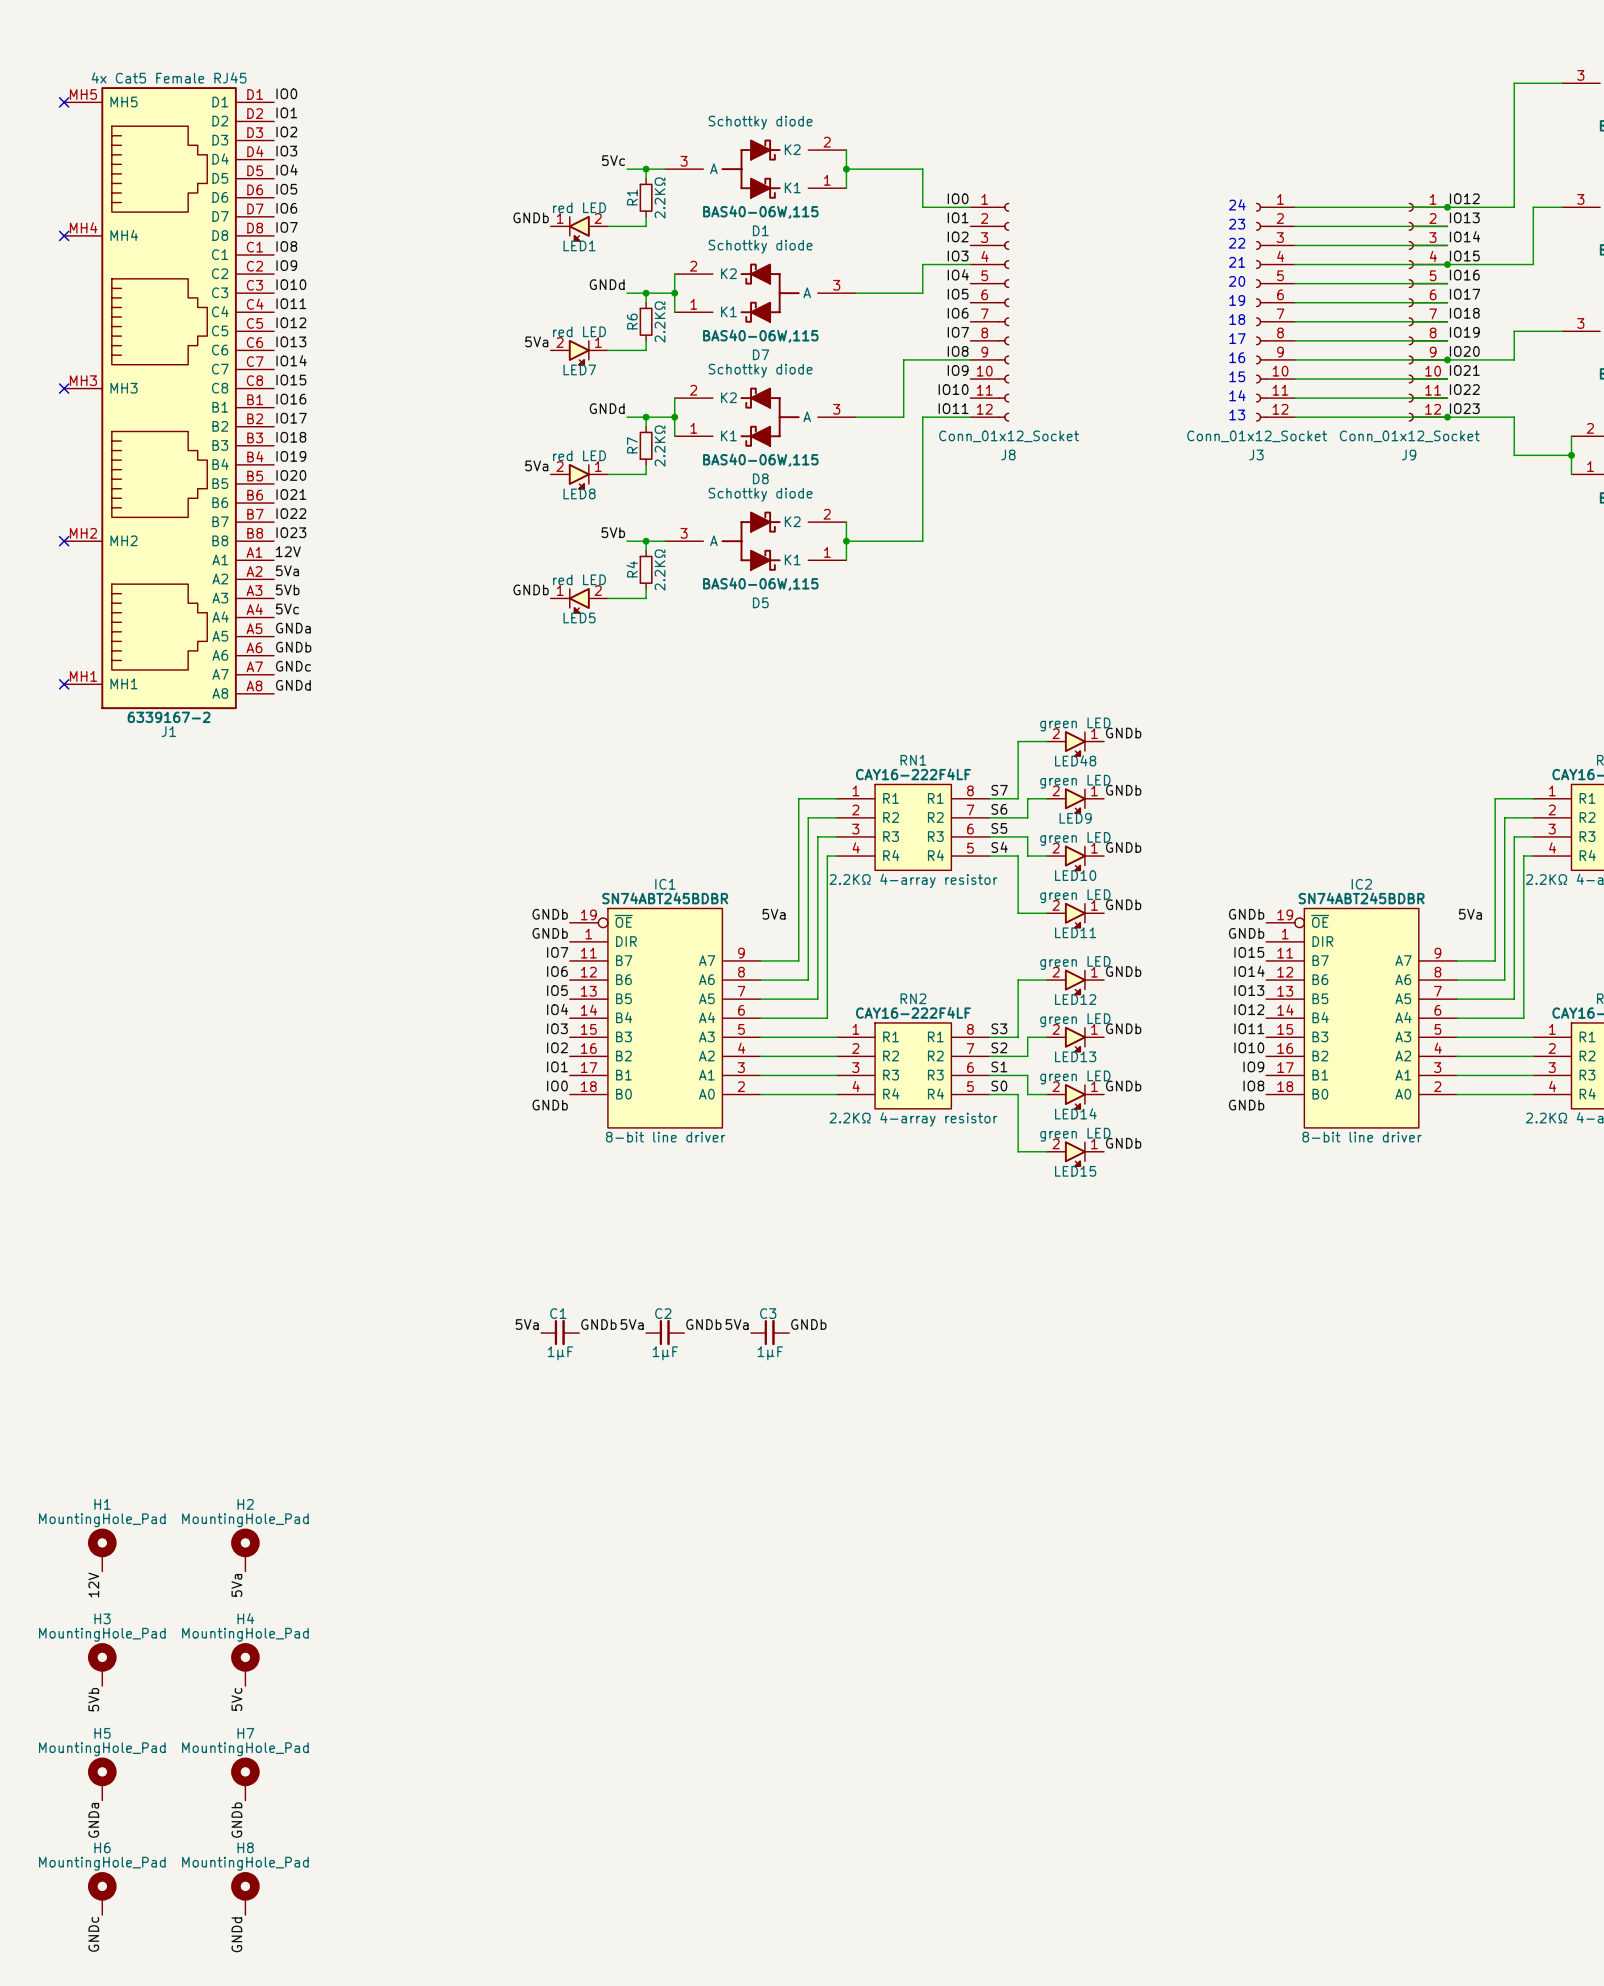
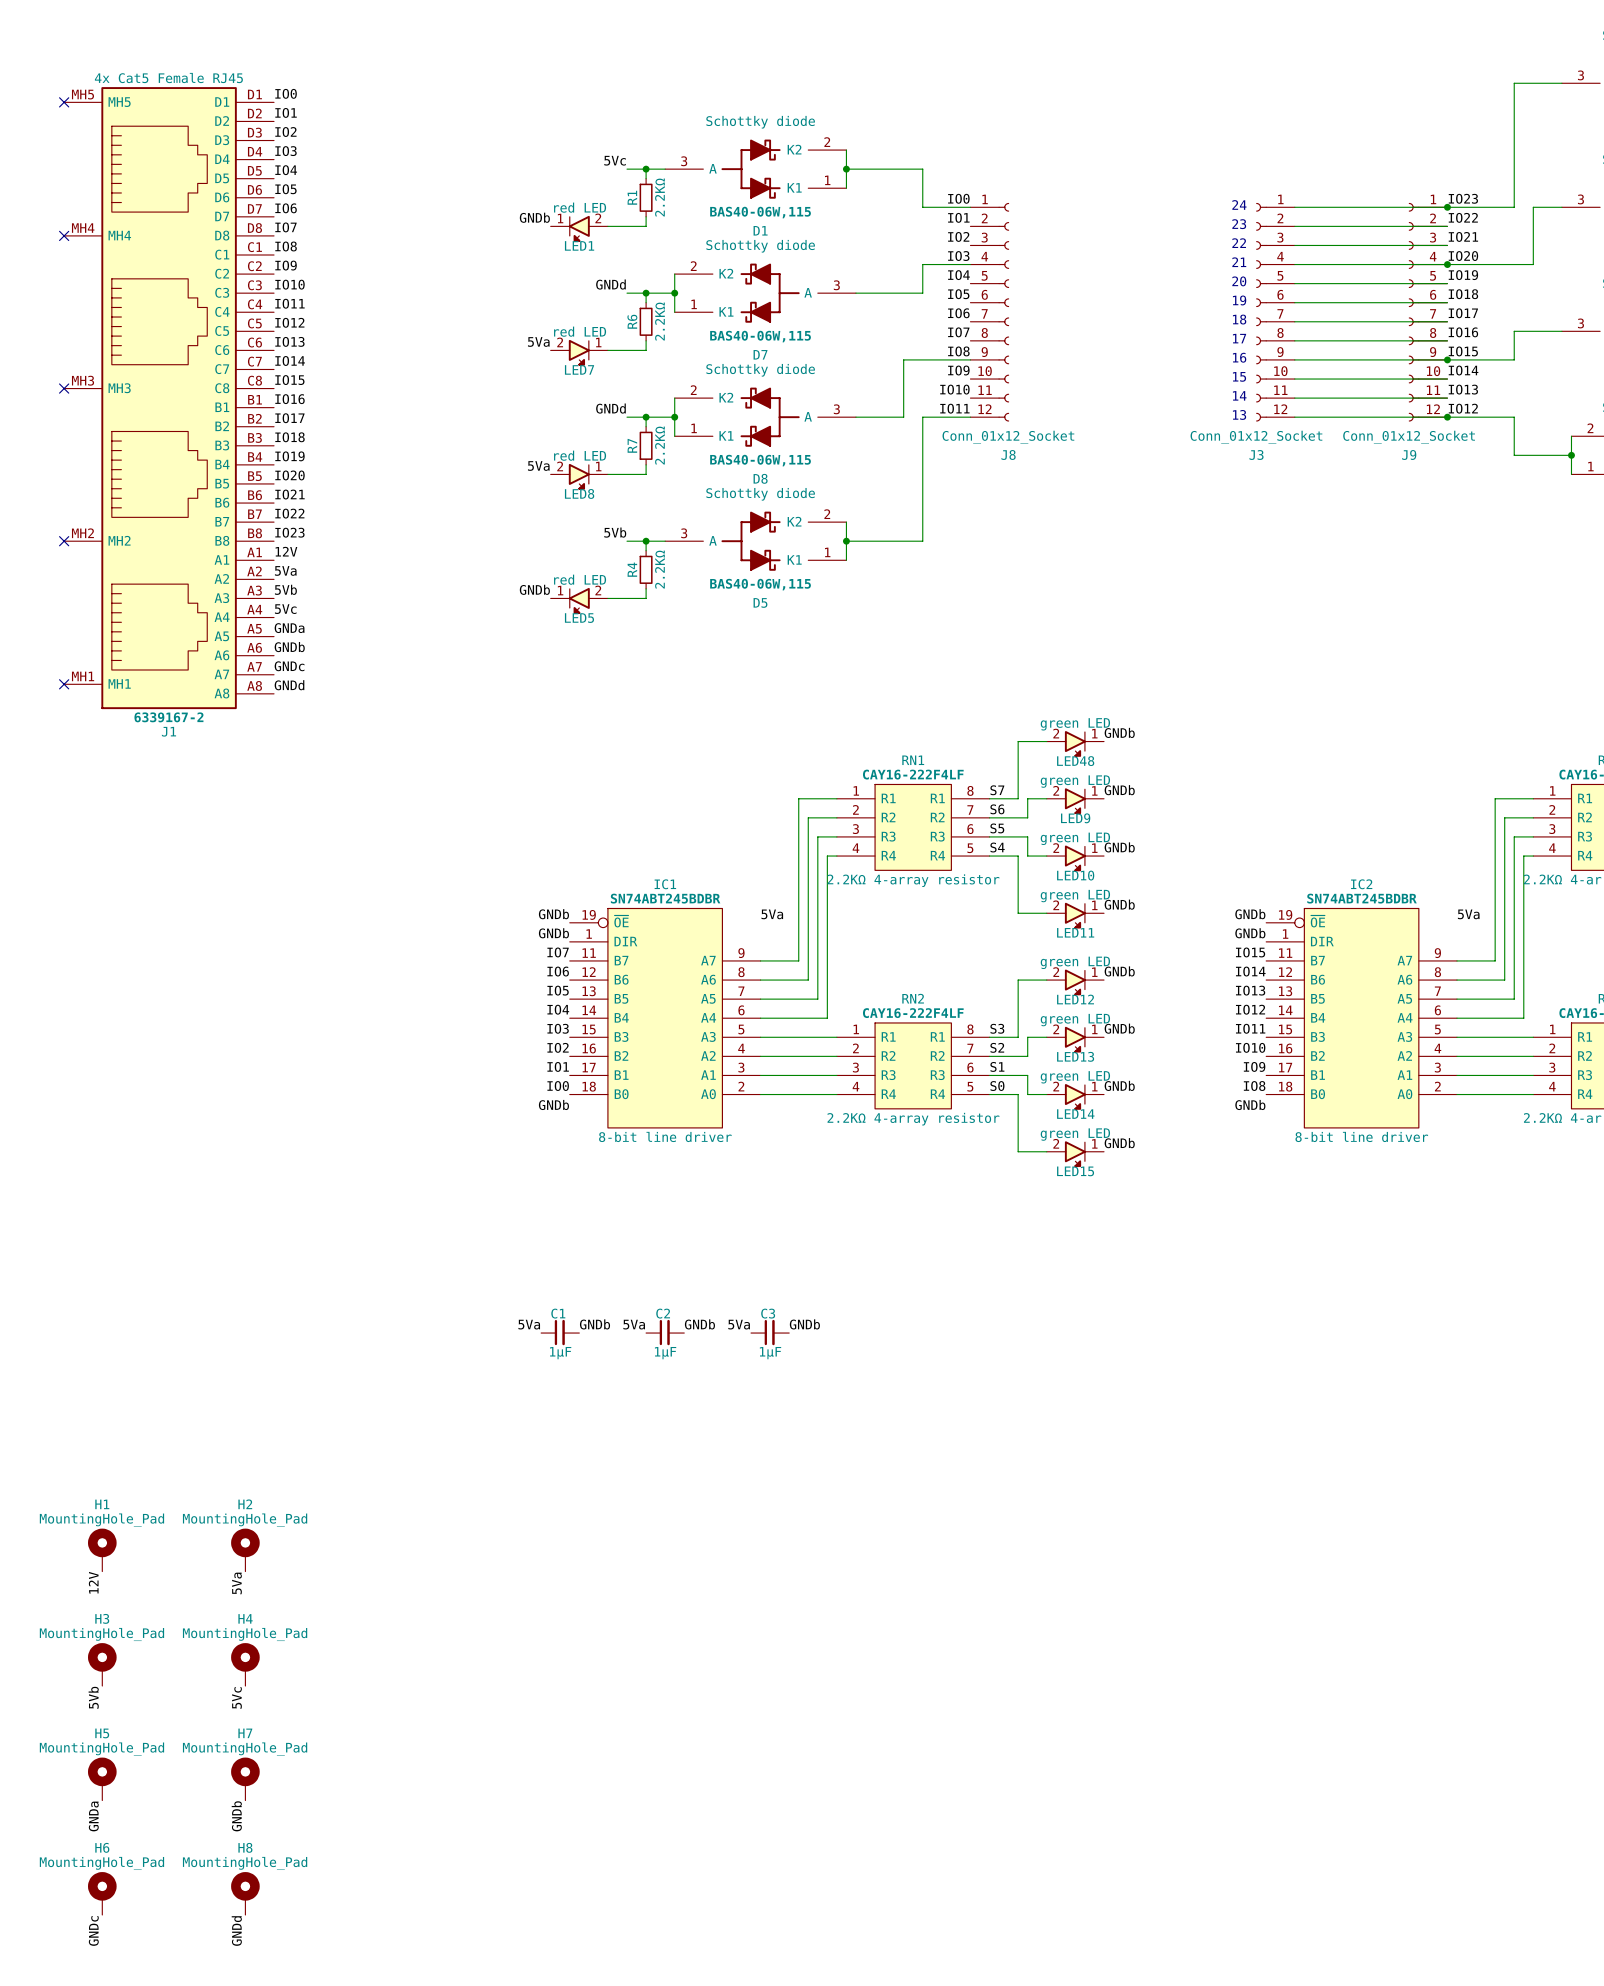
label: IO12 (1464, 198) -> IO23 (1463, 198)
label: IO13 (1464, 217) -> IO22 (1463, 217)
label: IO14 (1465, 236) -> IO21 (1463, 236)
label: IO15 (1464, 256) -> IO20 (1463, 256)
label: IO16 (1464, 275) -> IO19 (1463, 275)
label: IO17 (1465, 294) -> IO18 (1463, 294)
label: IO18 (1464, 313) -> IO17 (1463, 313)
label: IO19 (1464, 332) -> IO16 (1463, 332)
label: IO20 (1464, 351) -> IO15 (1463, 351)
label: IO21 (1464, 370) -> IO14 (1463, 370)
label: IO22 (1464, 389) -> IO13 (1463, 389)
label: IO23 (1464, 408) -> IO12 (1463, 408)

